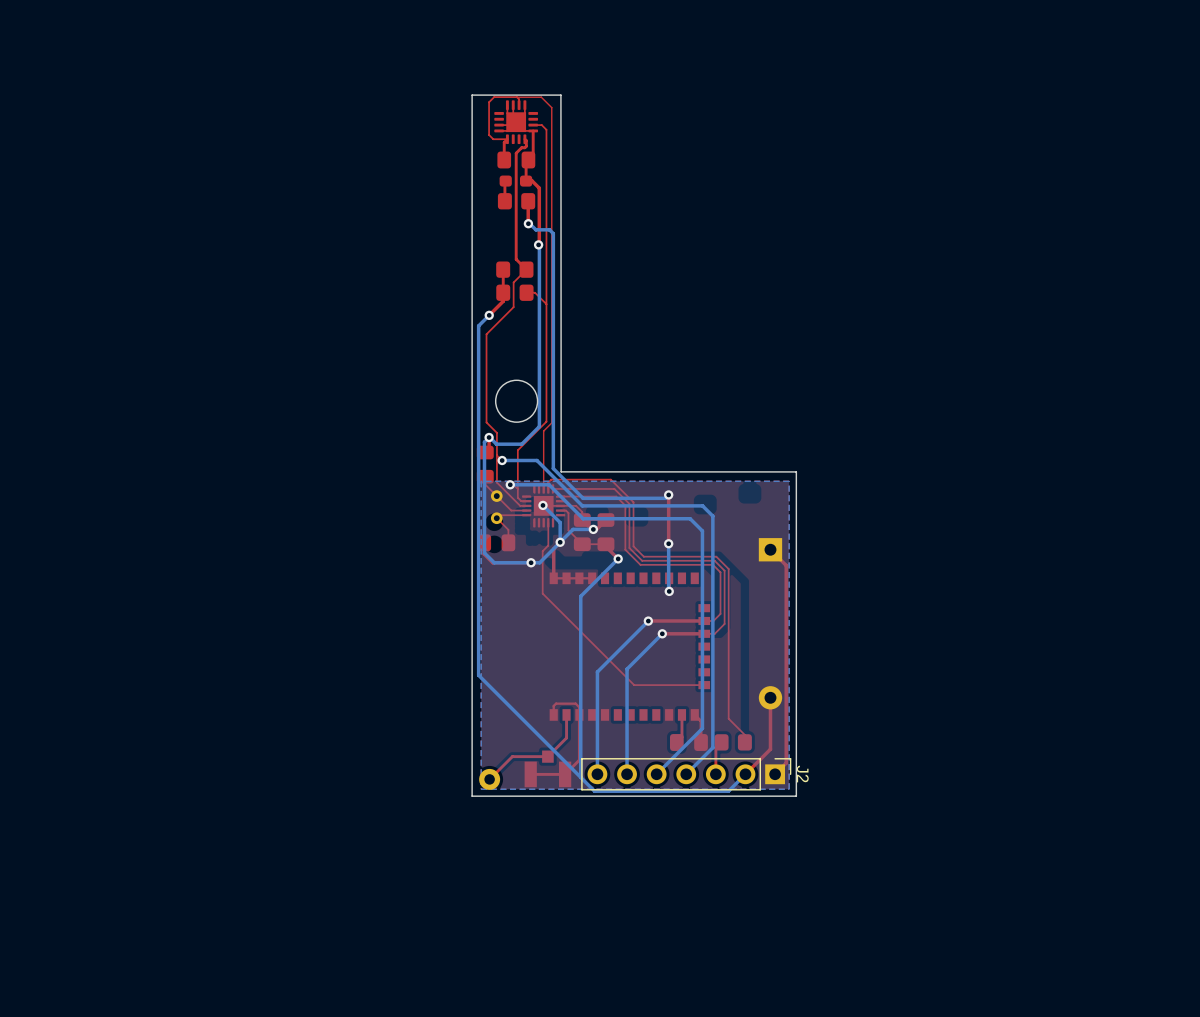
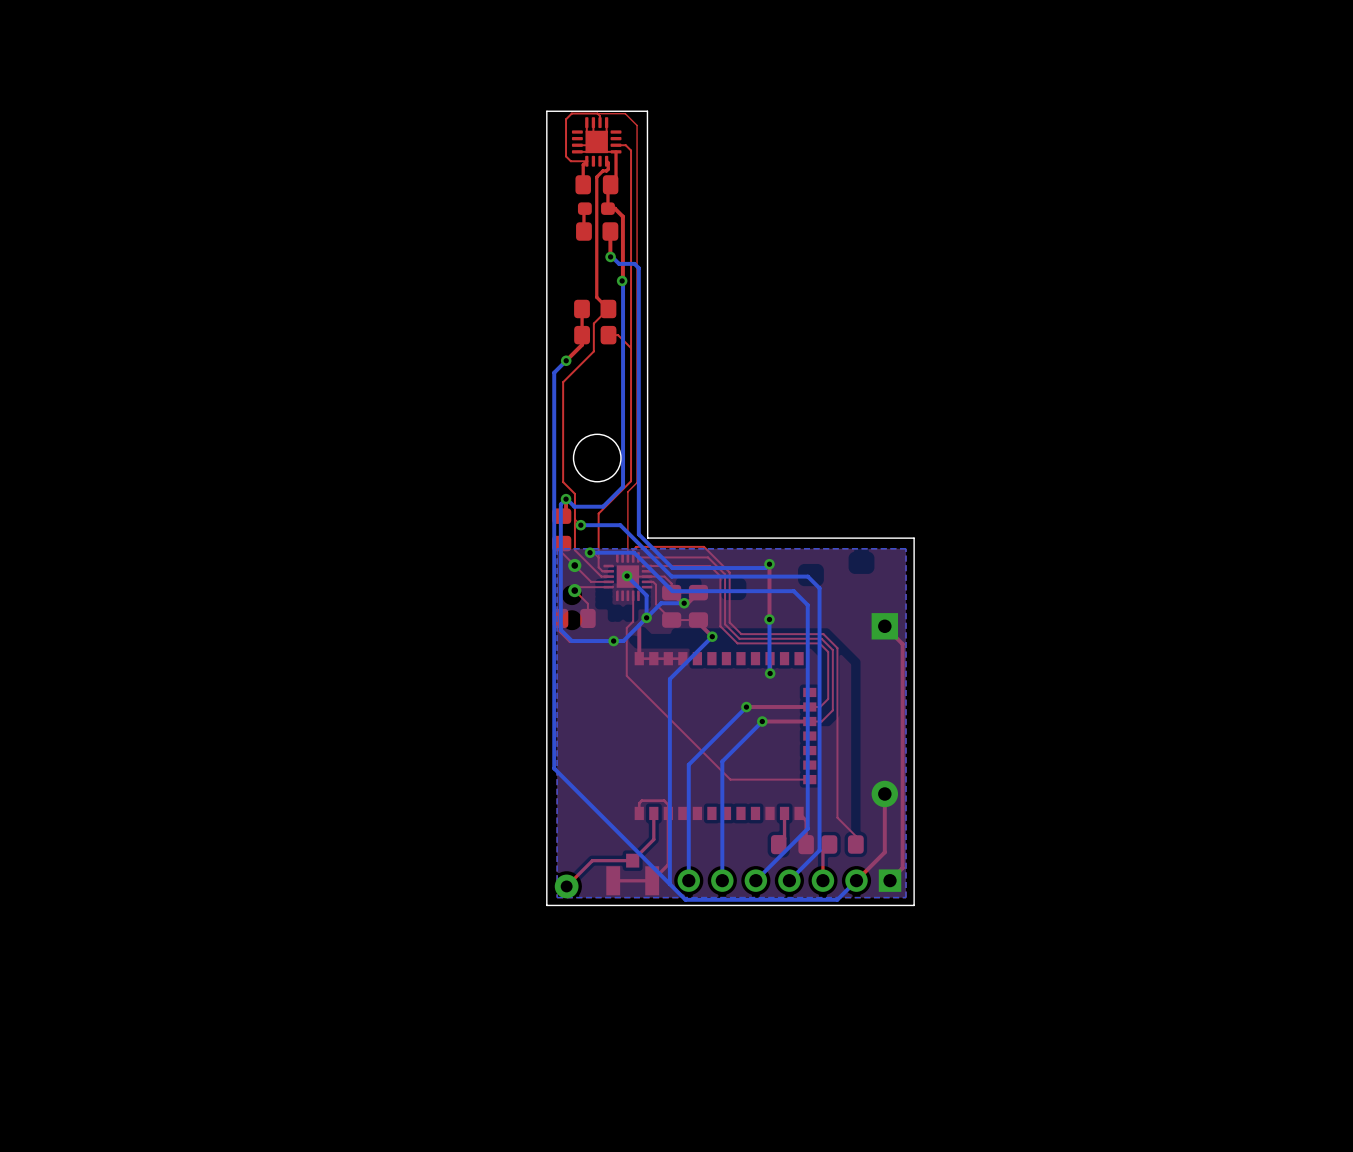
J2: (686, 774) -> none

